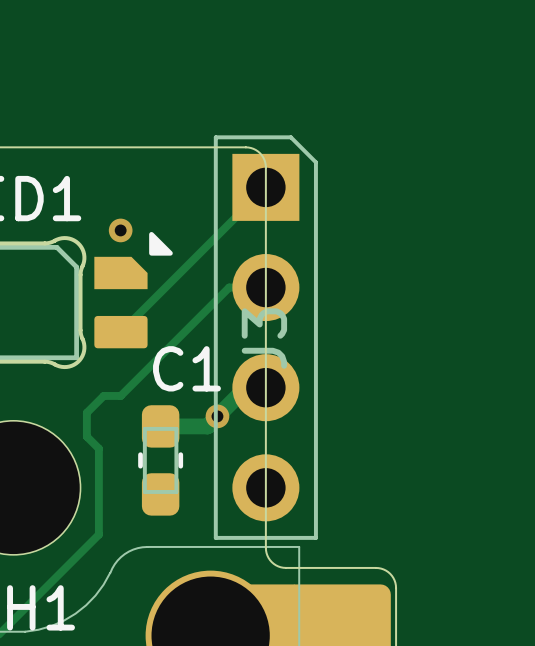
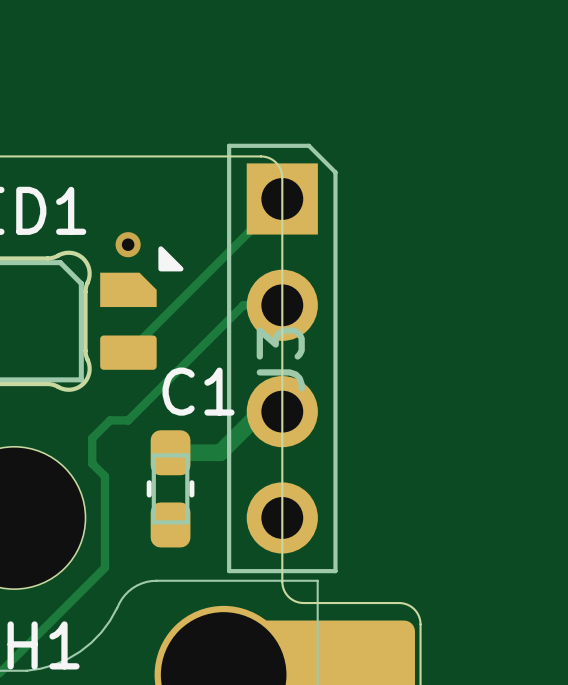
via: (217, 416) -> none

